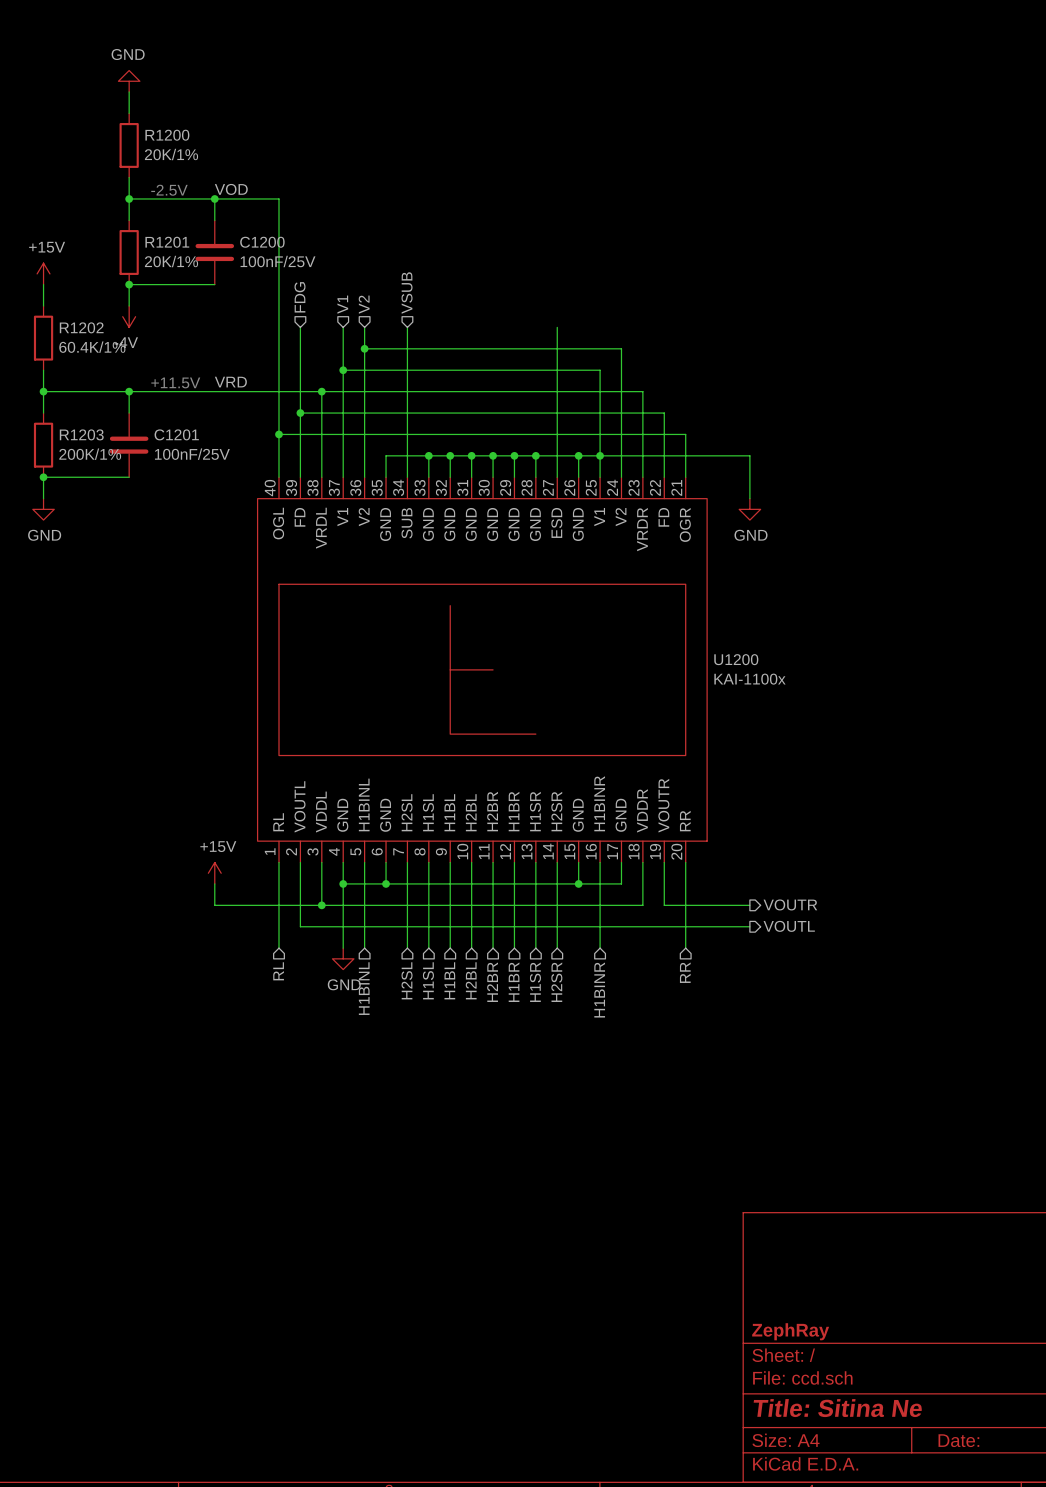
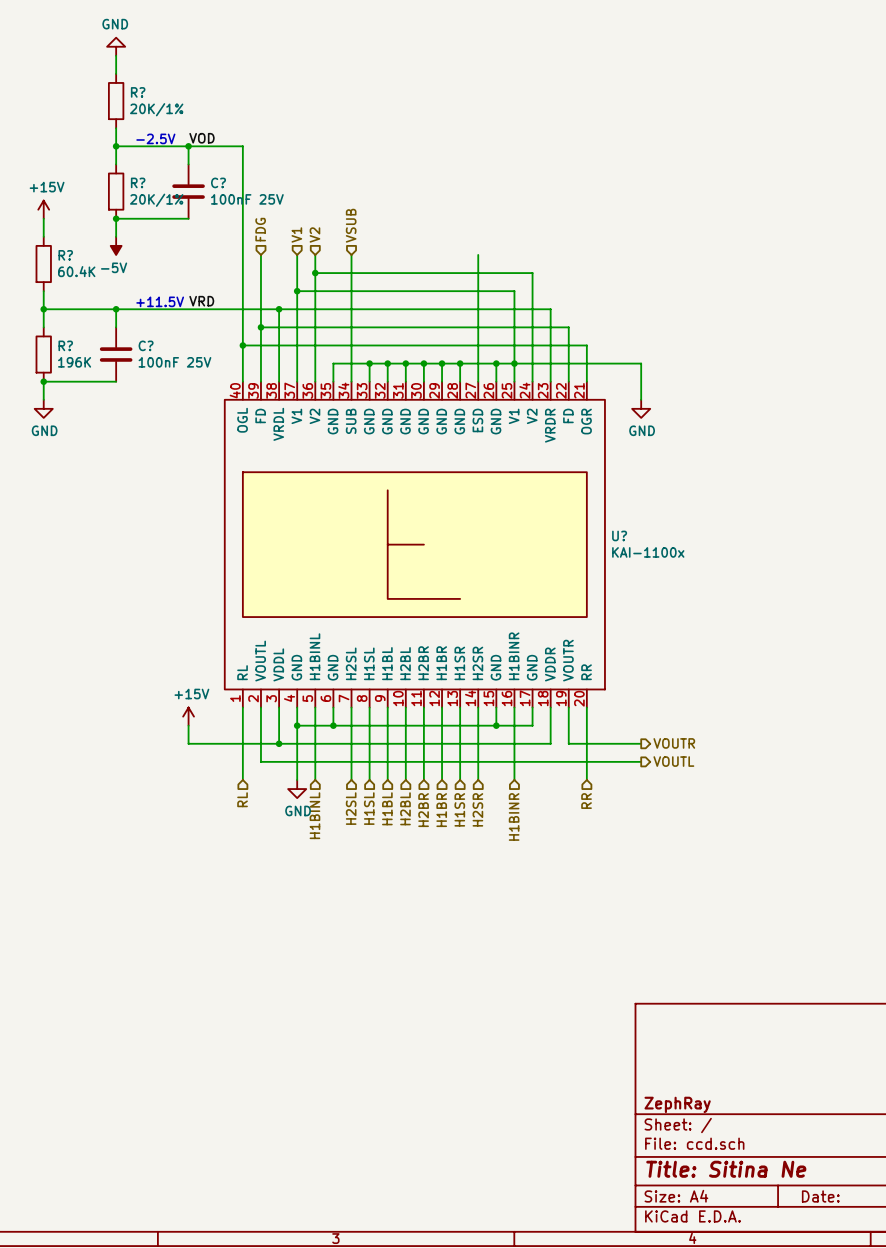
R1200 name: R1200 (167, 135) -> R? (138, 92)
R1201 name: R1201 (167, 242) -> R? (138, 182)
C1200 name: C1200 (262, 242) -> C? (218, 182)
C1200 value: 100nF/25V (278, 261) -> 100nF 25V (247, 199)
power symbol: -4V (129, 316) -> -5V (116, 245)
R1202 name: R1202 (81, 327) -> R? (65, 255)
R1202 value: 60.4K/1% (92, 347) -> 60.4K (76, 271)
R1203 name: R1203 (81, 434) -> R? (65, 345)
C1201 name: C1201 (176, 434) -> C? (146, 345)
R1203 value: 200K/1% (90, 454) -> 196K (74, 362)
C1201 value: 100nF/25V (192, 454) -> 100nF 25V (174, 362)
U1200 name: U1200 (736, 659) -> U? (619, 535)

